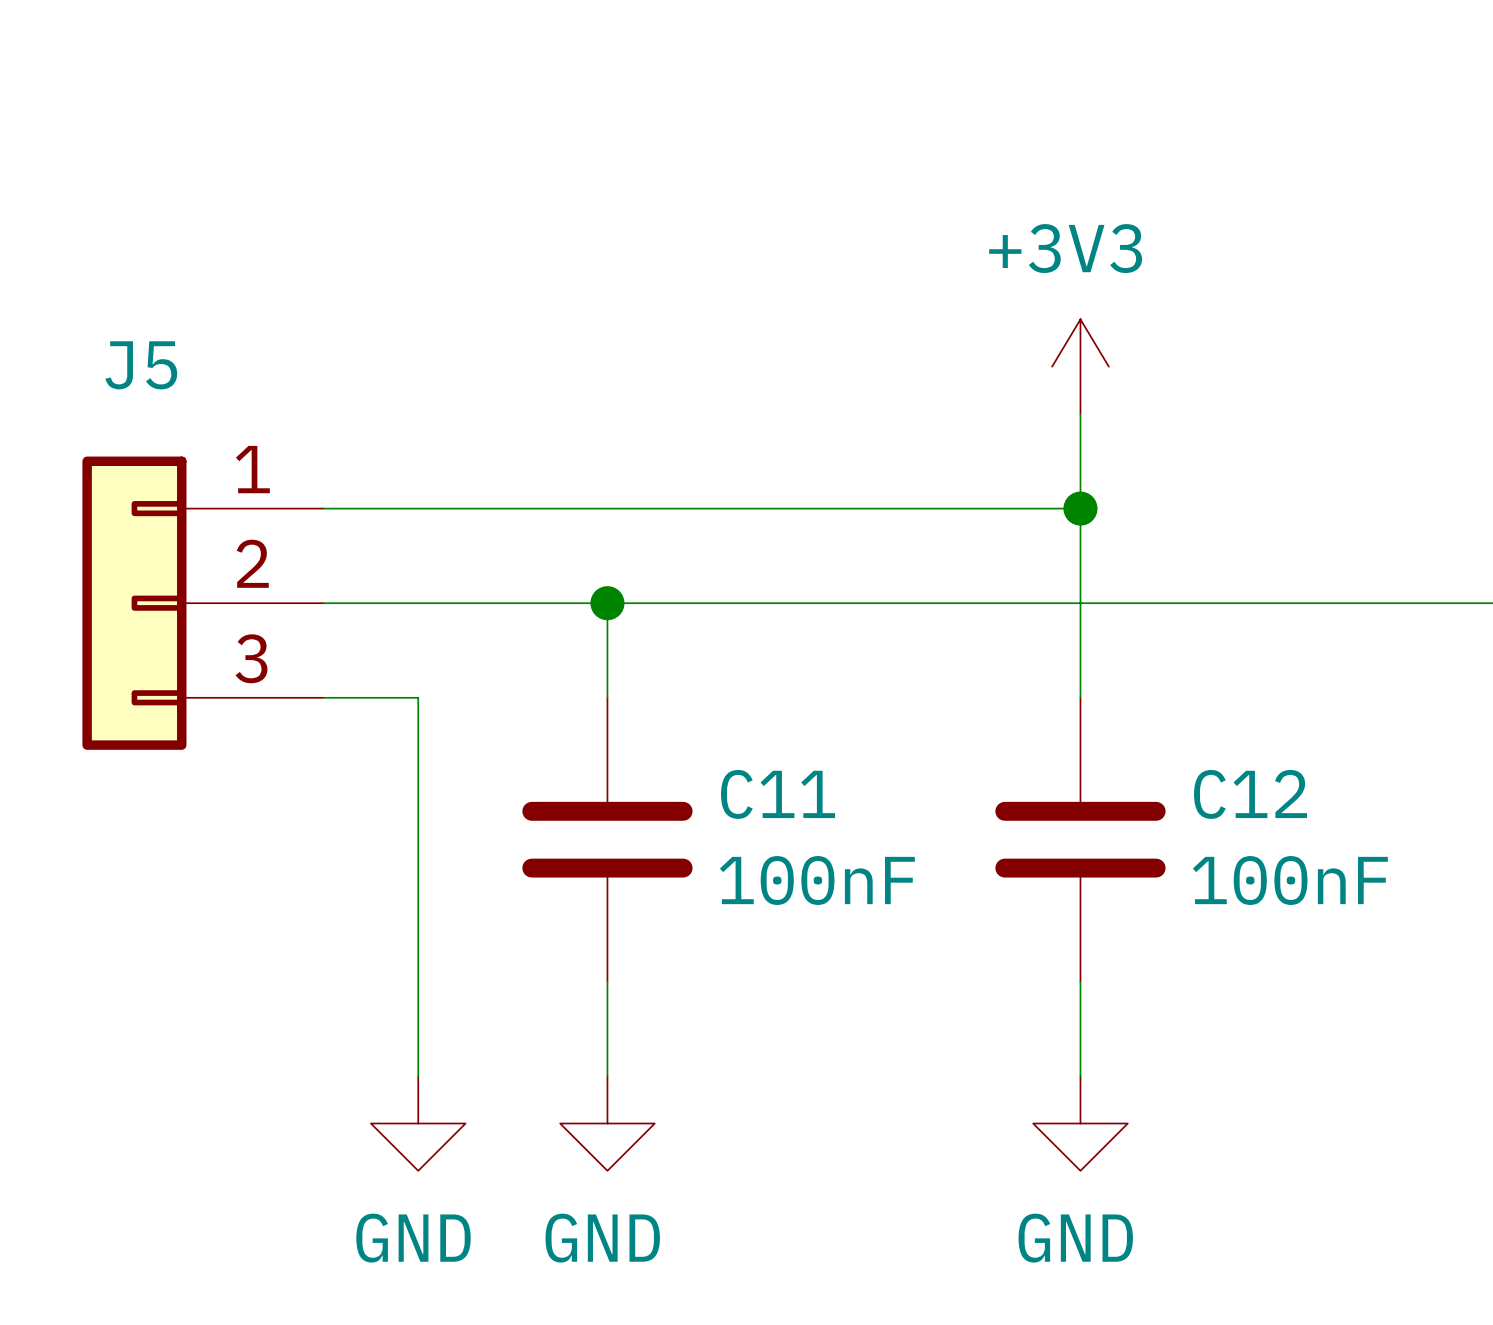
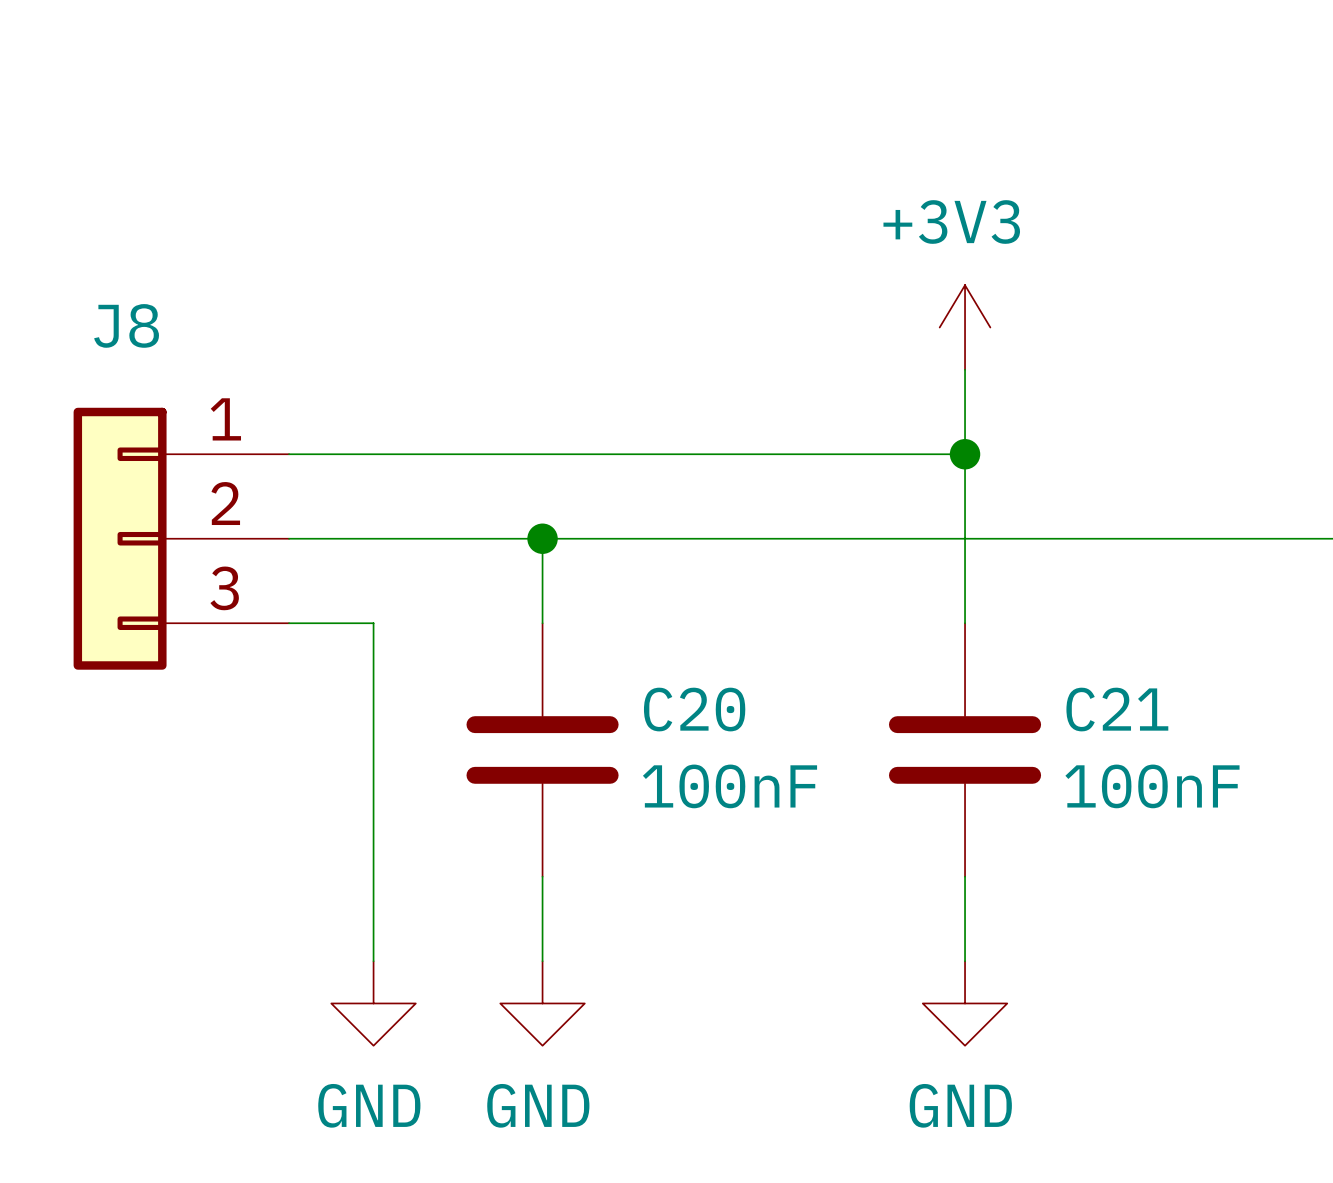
J5 name: J5 (141, 365) -> J8 (126, 325)
C11 name: C11 (778, 794) -> C20 (694, 709)
C12 name: C12 (1250, 794) -> C21 (1117, 709)

